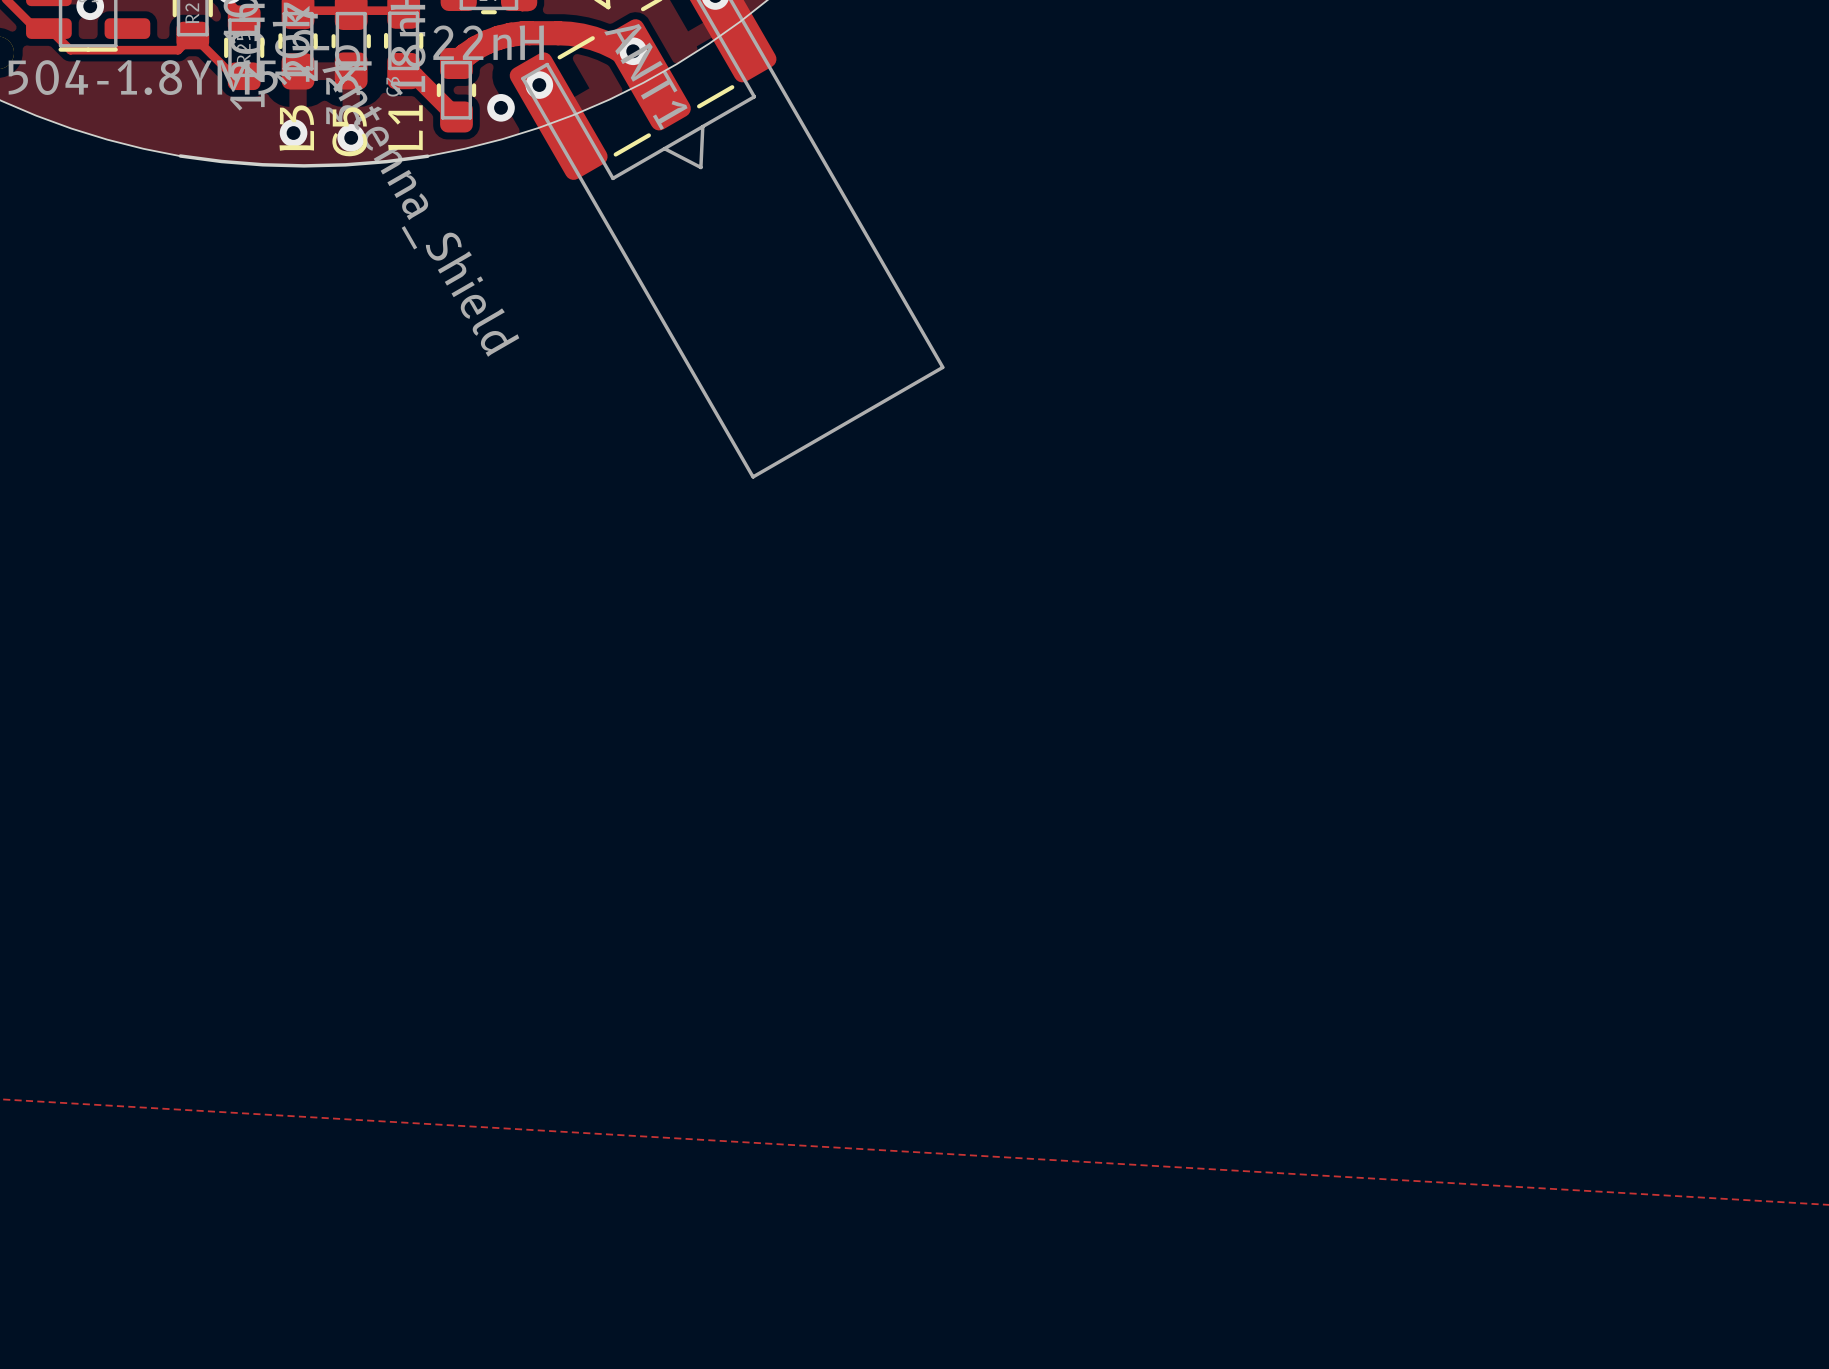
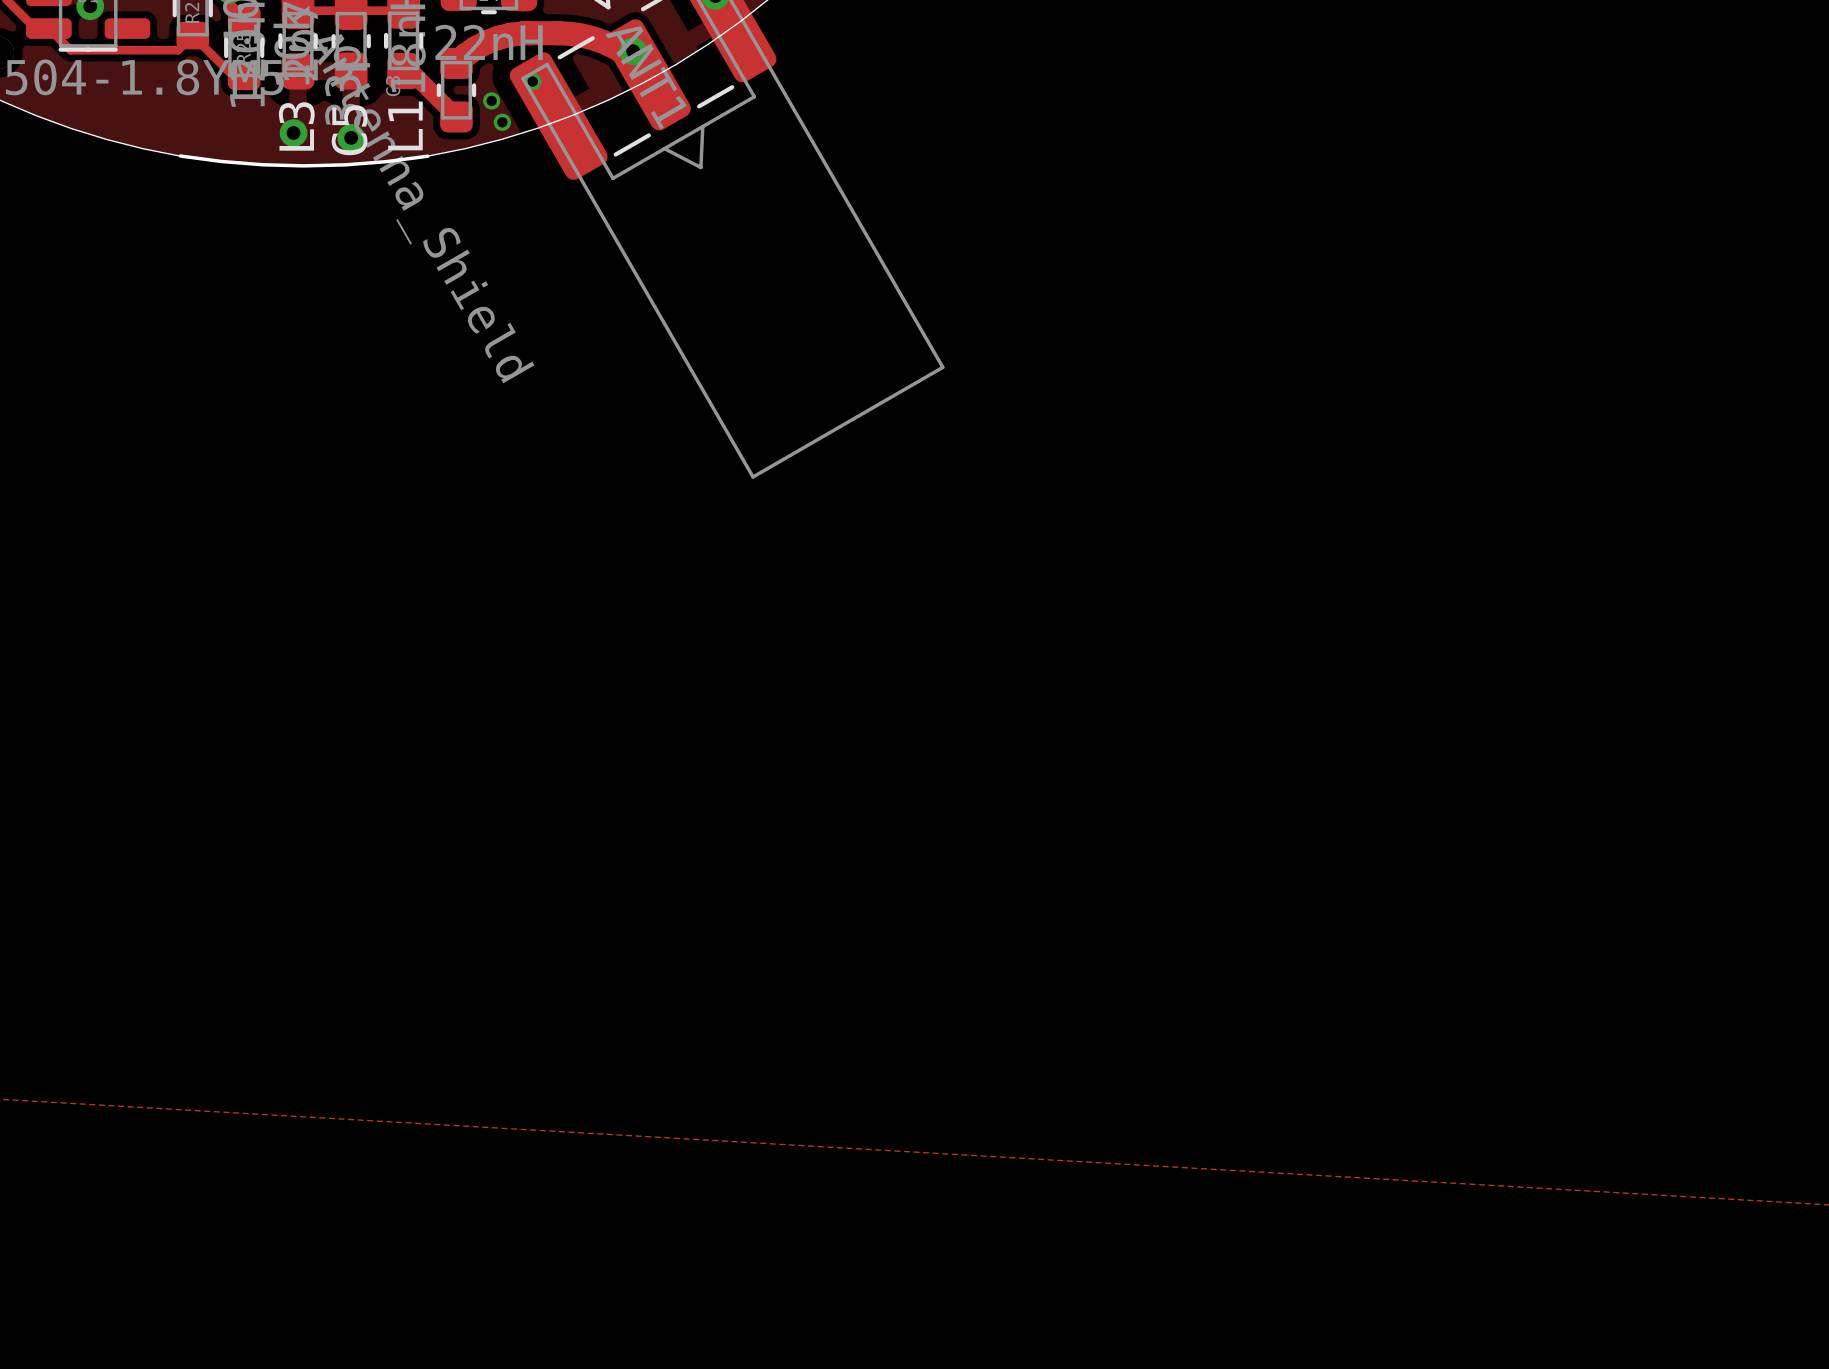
via size: [525, 71, 554, 99] -> [524, 72, 542, 91]
via: none -> (491, 100)
via: (501, 107) -> none
via: none -> (502, 122)

